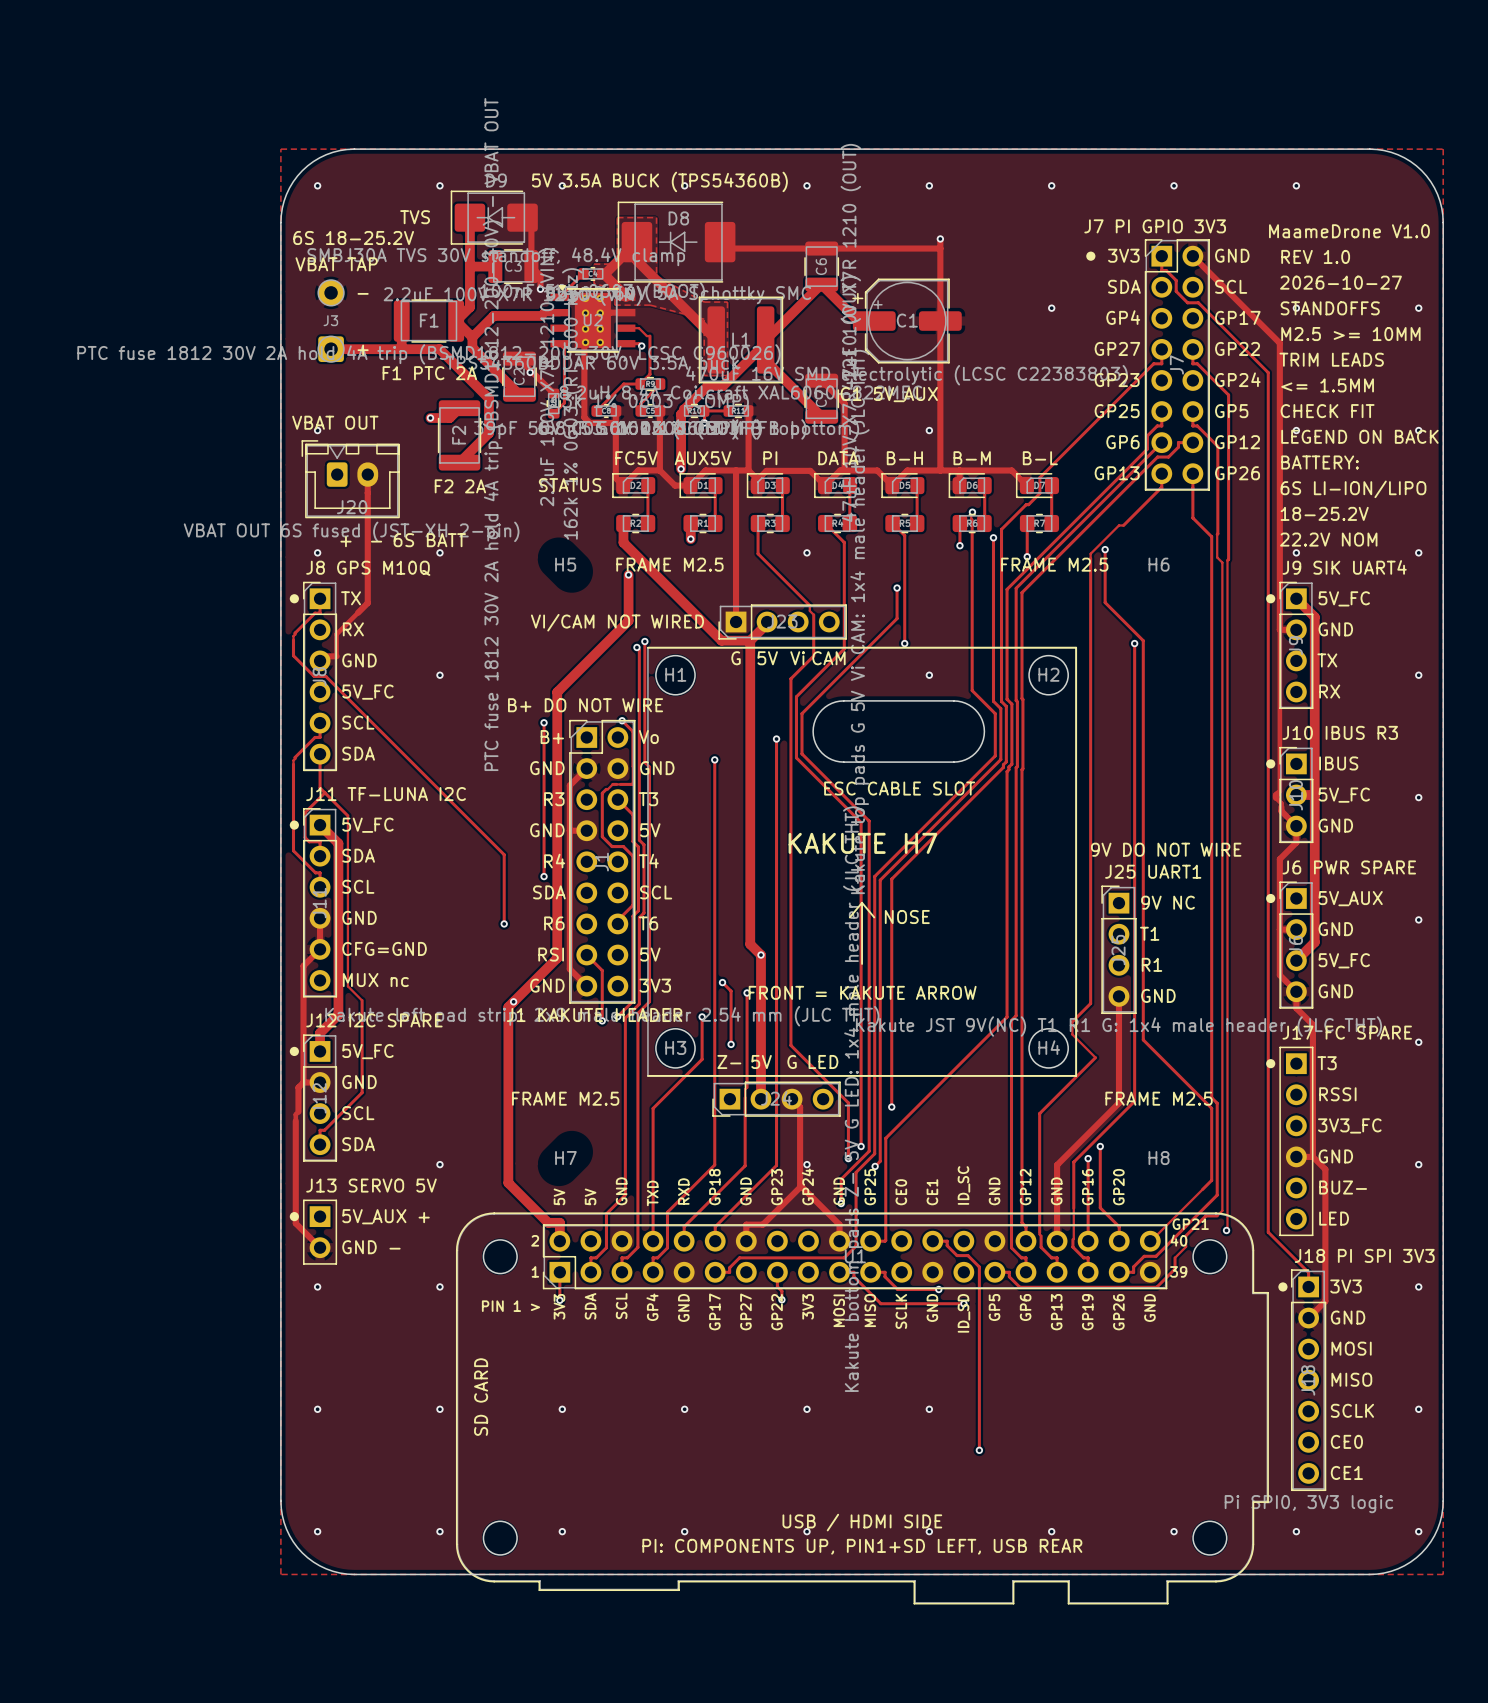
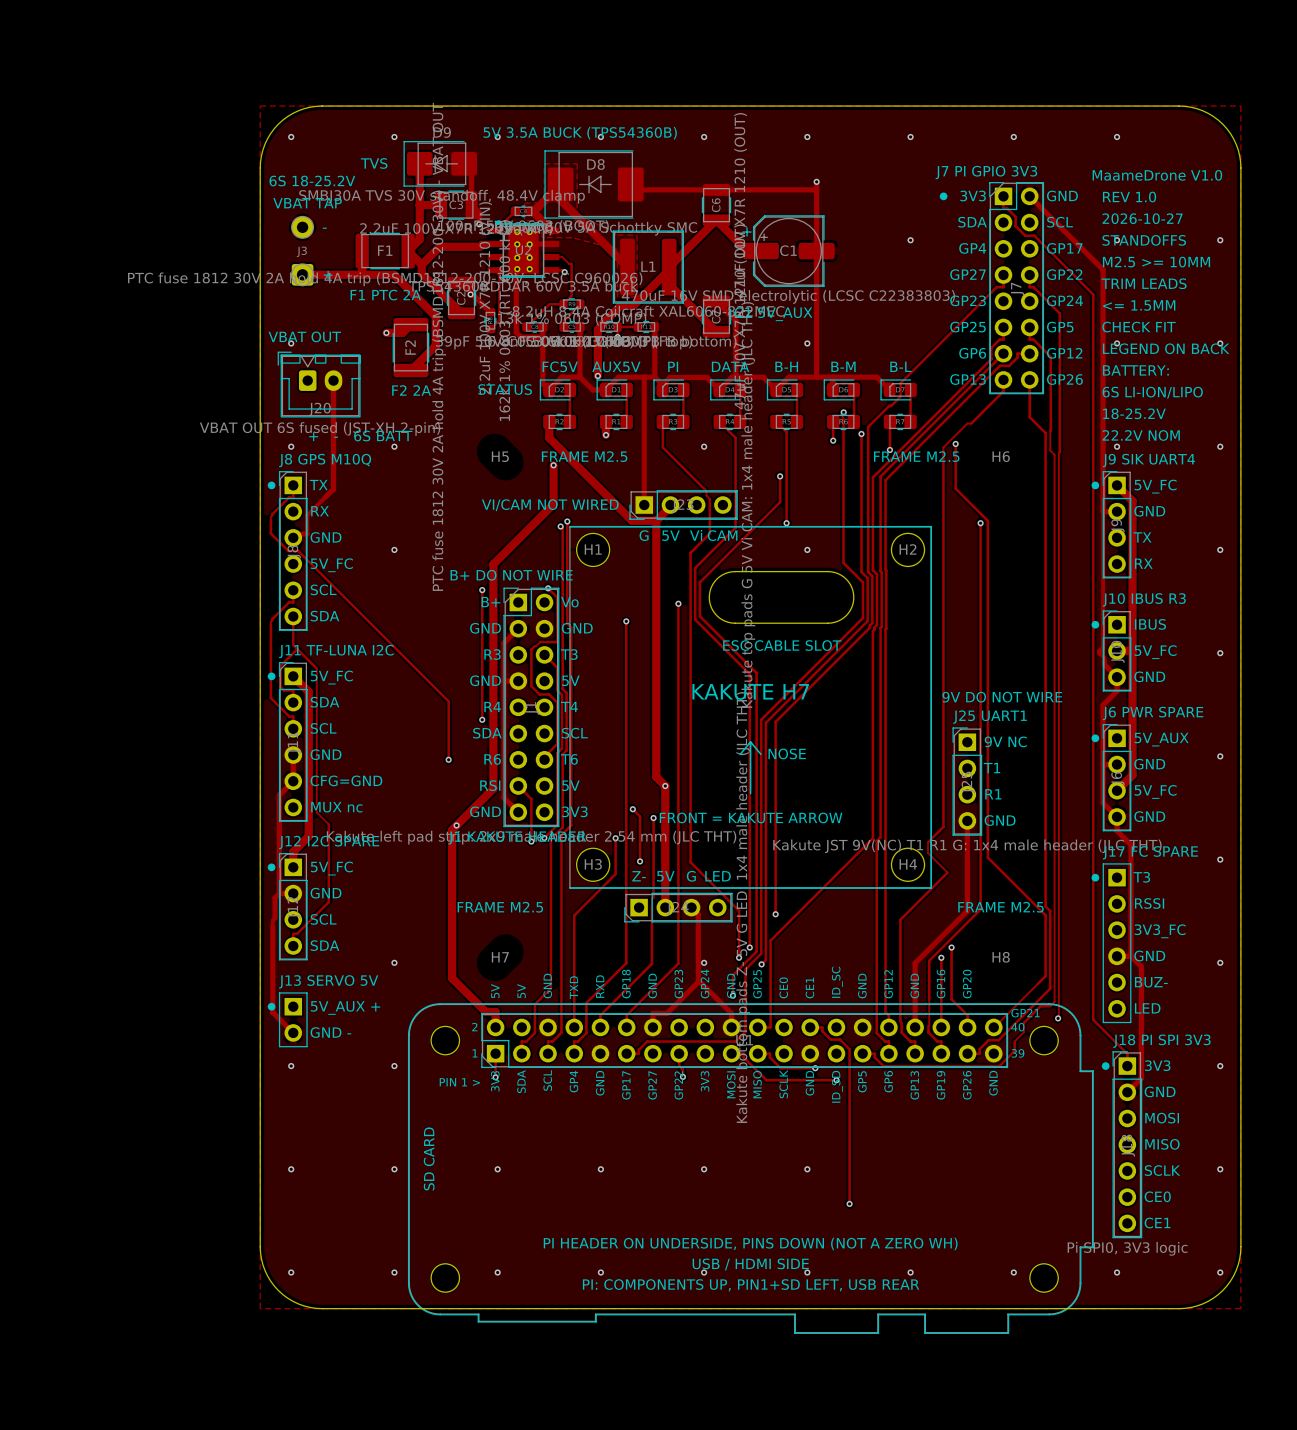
text: none -> PI HEADER ON UNDERSIDE, PINS DOWN (NOT A ZERO WH) (750, 1243)

